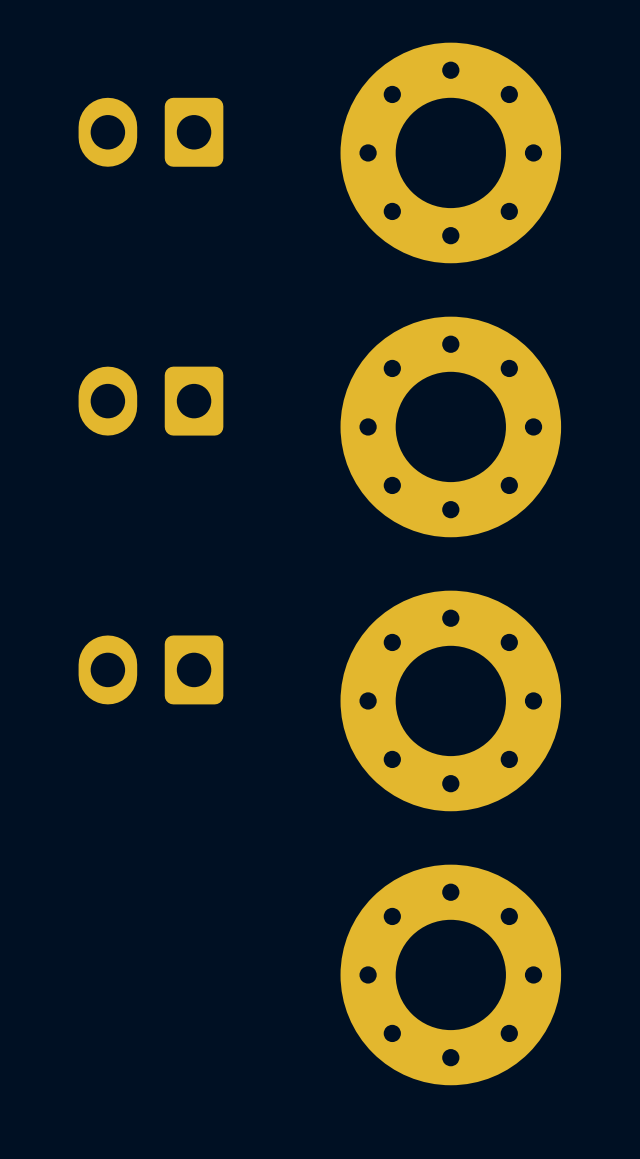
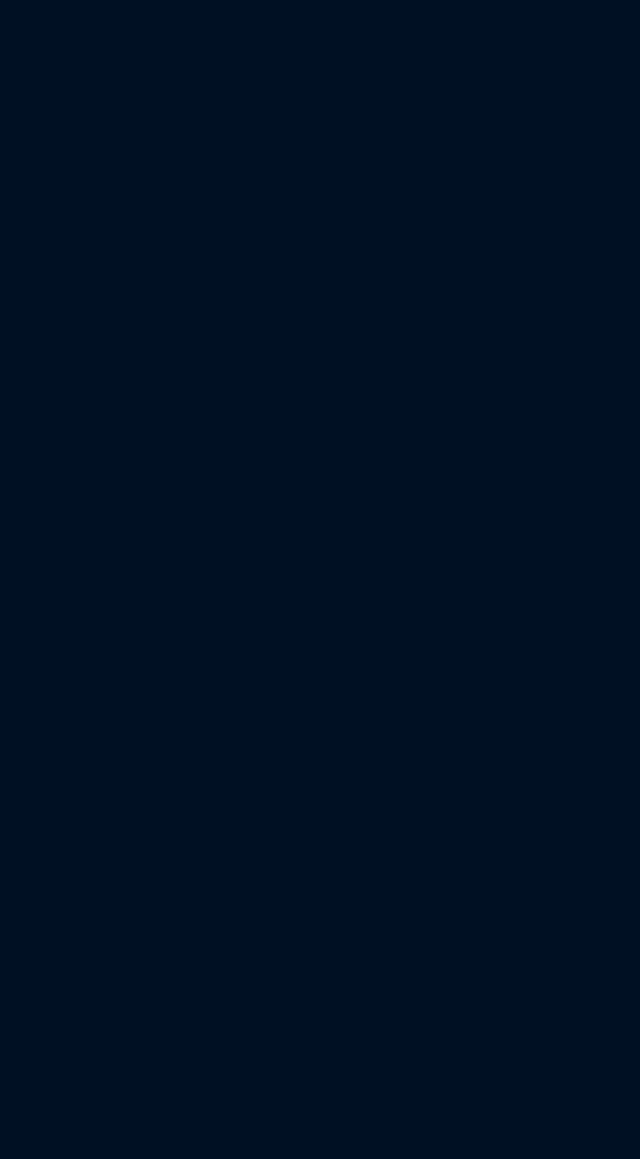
part: (150, 132) -> none
part: (450, 152) -> none
part: (150, 401) -> none
part: (450, 426) -> none
part: (150, 669) -> none
part: (450, 700) -> none
part: (450, 974) -> none

